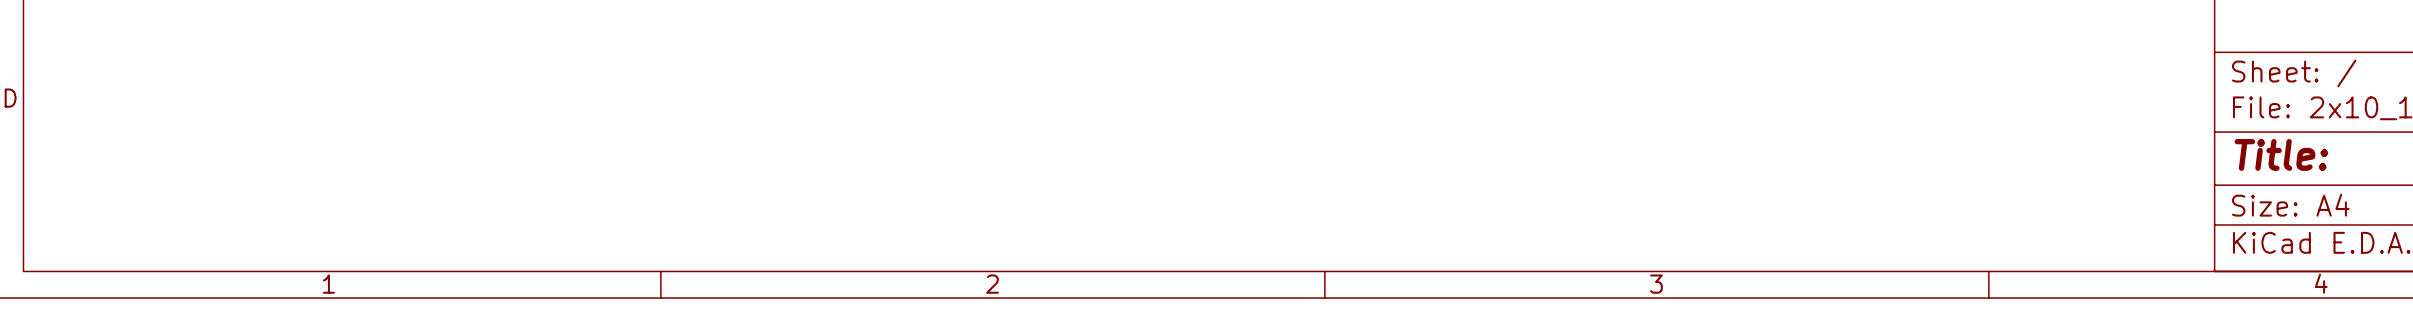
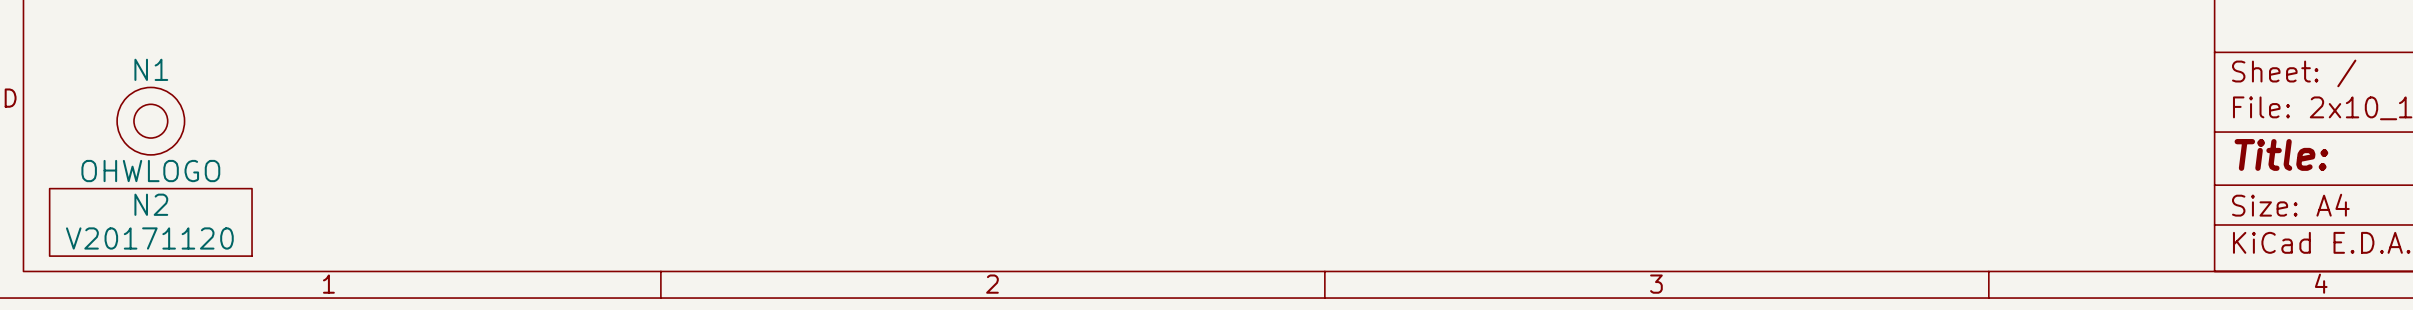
N1: none -> OHWLOGO (150, 121)
N2: none -> V20171120 (150, 222)

